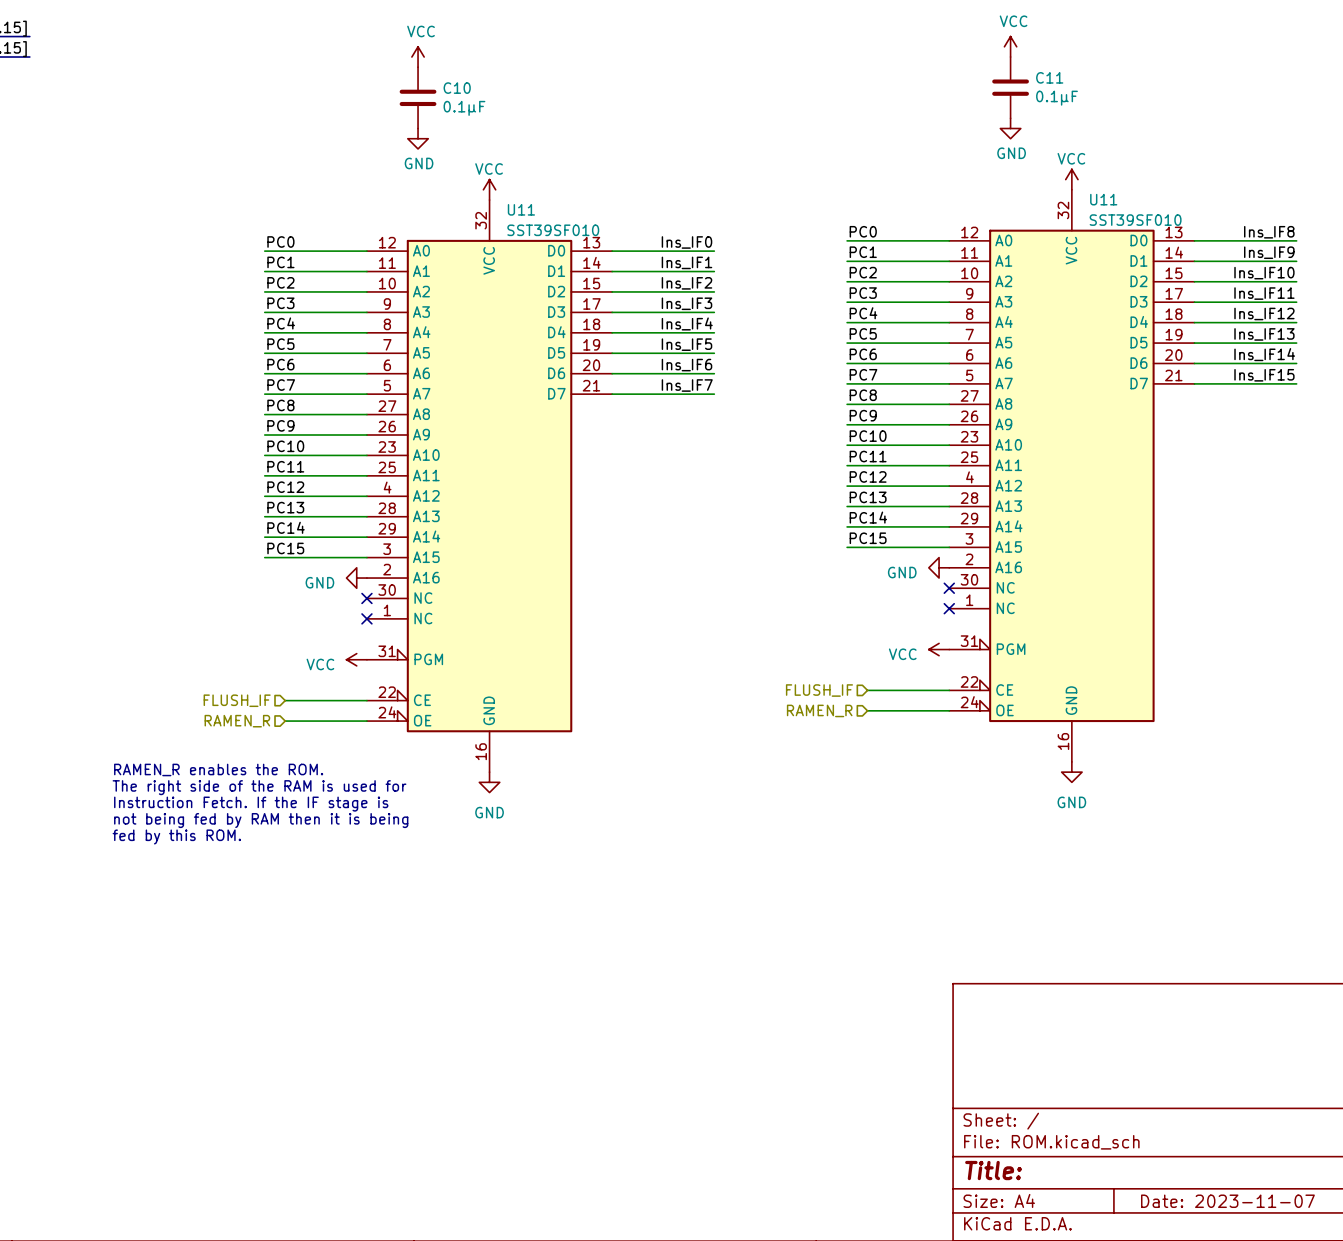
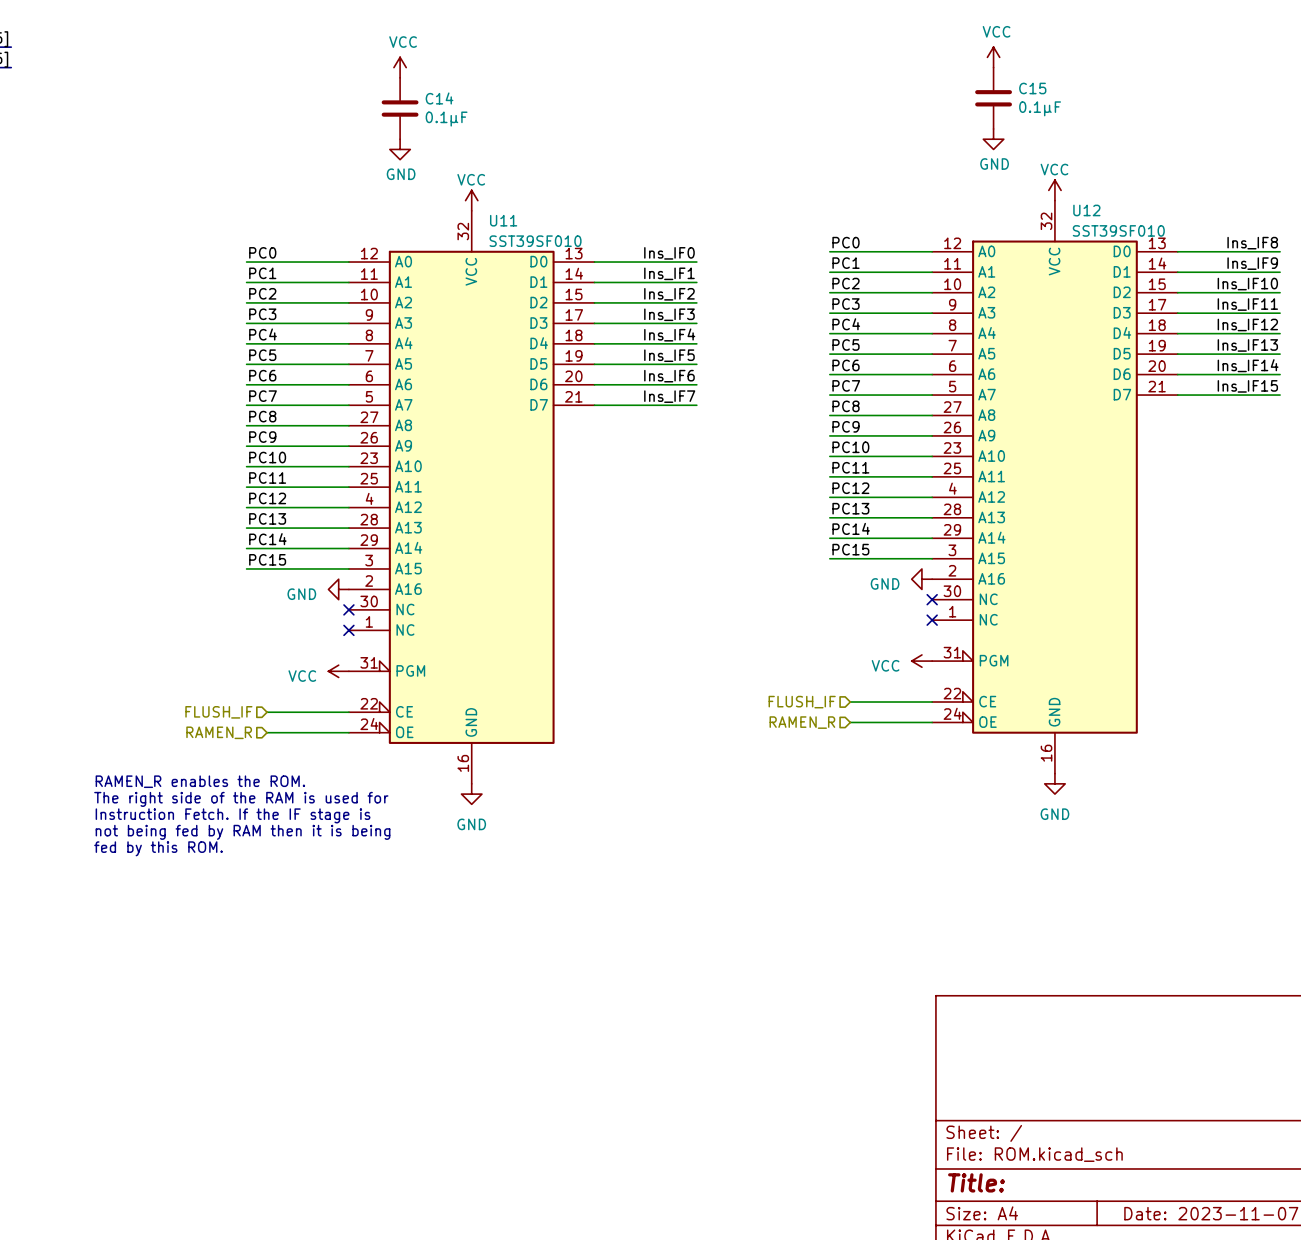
C11 name: C11 (1049, 77) -> C15 (1032, 88)
C10 name: C10 (457, 88) -> C14 (439, 98)
U11 name: U11 (1103, 199) -> U12 (1086, 210)

